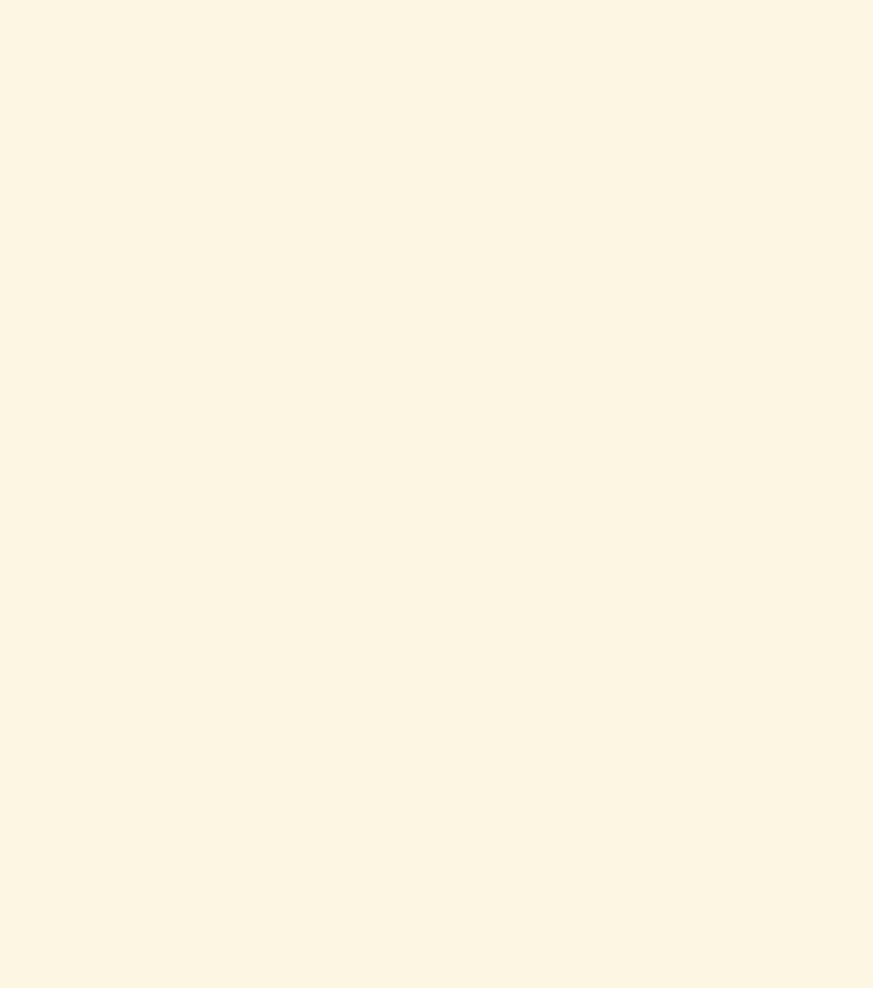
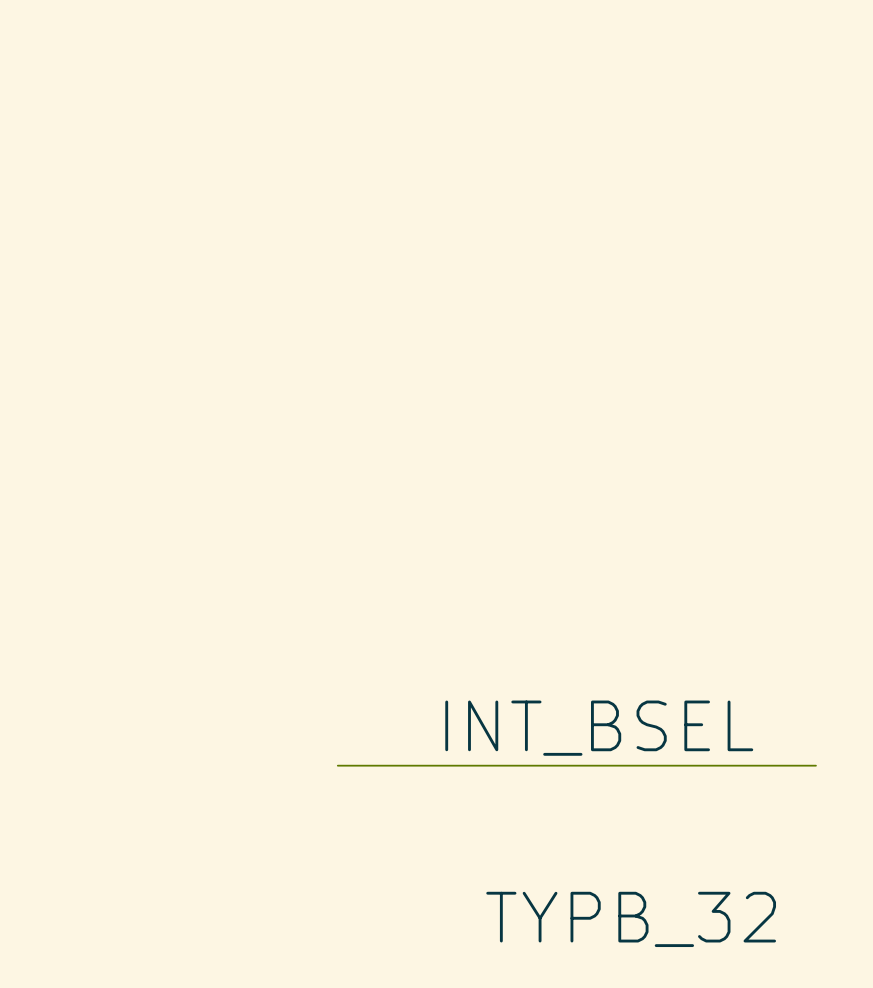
label: none -> INT_BSEL (599, 728)
wire: none -> (337, 765) (815, 765)
label: none -> TYPB_32 (631, 919)

